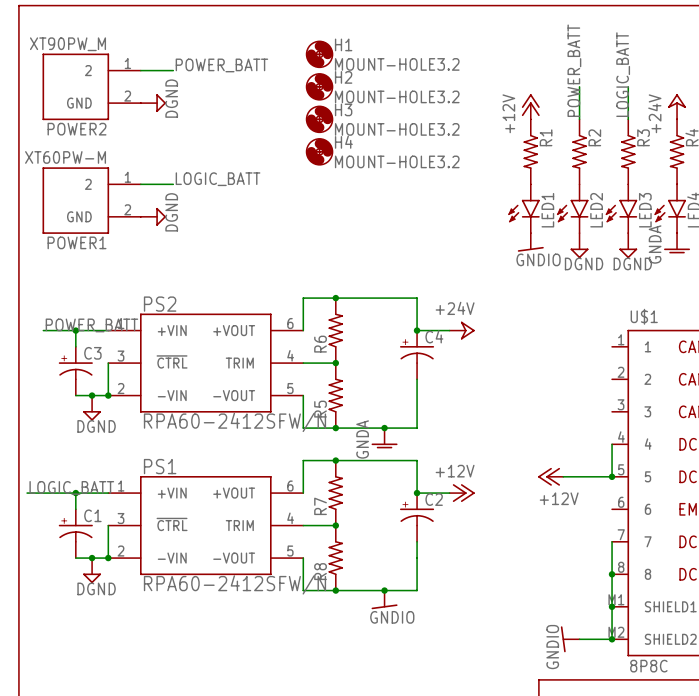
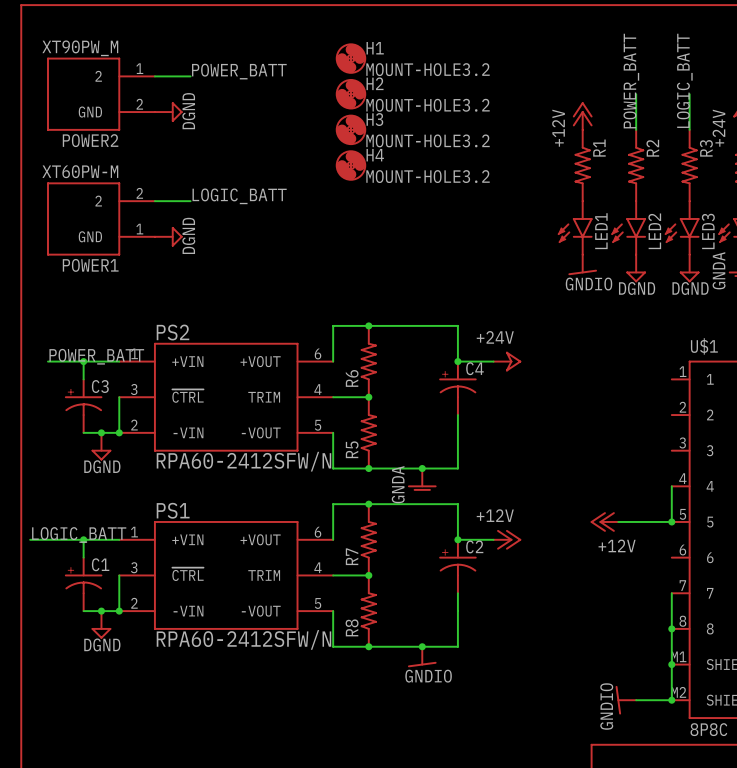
POWER1 pin number: 1 (127, 177) -> 2 (139, 193)
POWER1 pin number: 2 (127, 209) -> 1 (139, 229)

